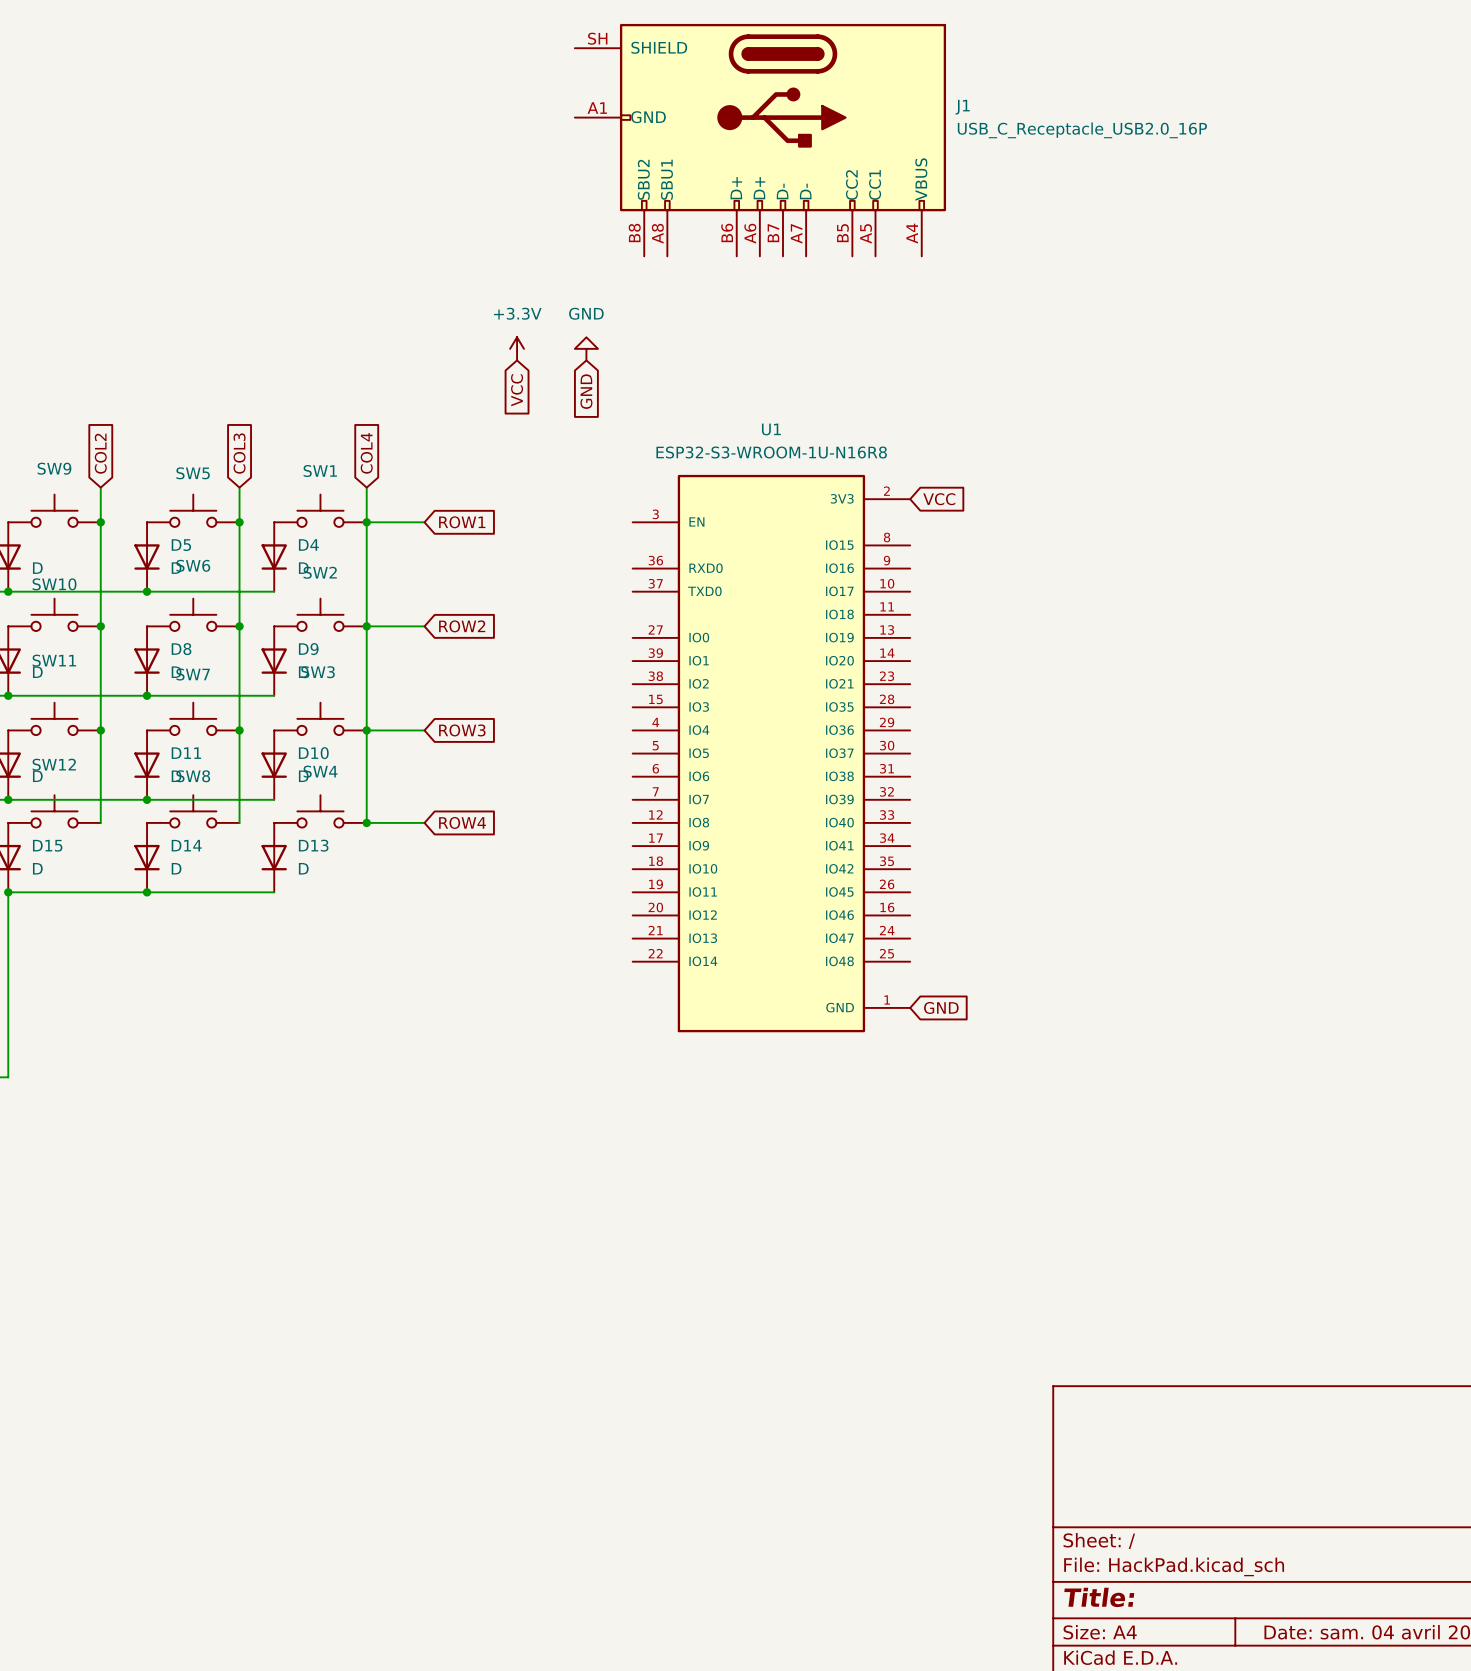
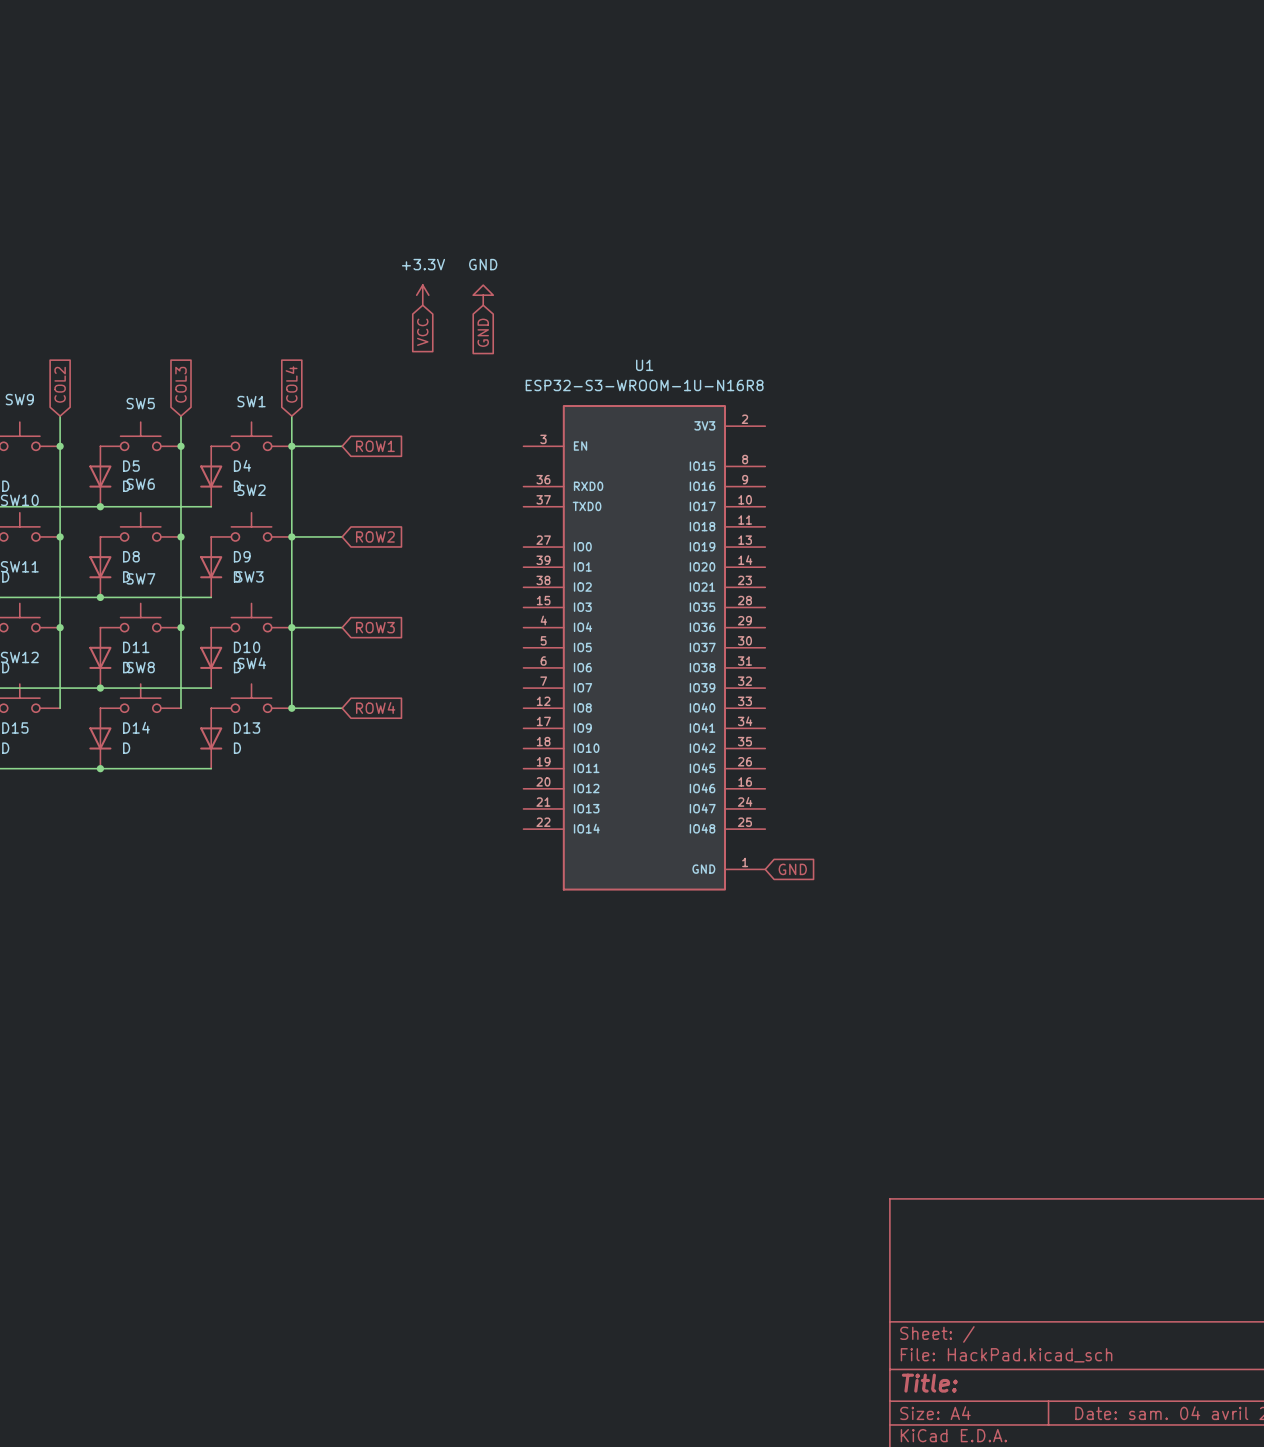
J1: USB_C_Receptacle_USB2.0_16P (760, 140) -> none
global label: VCC (939, 499) -> none

